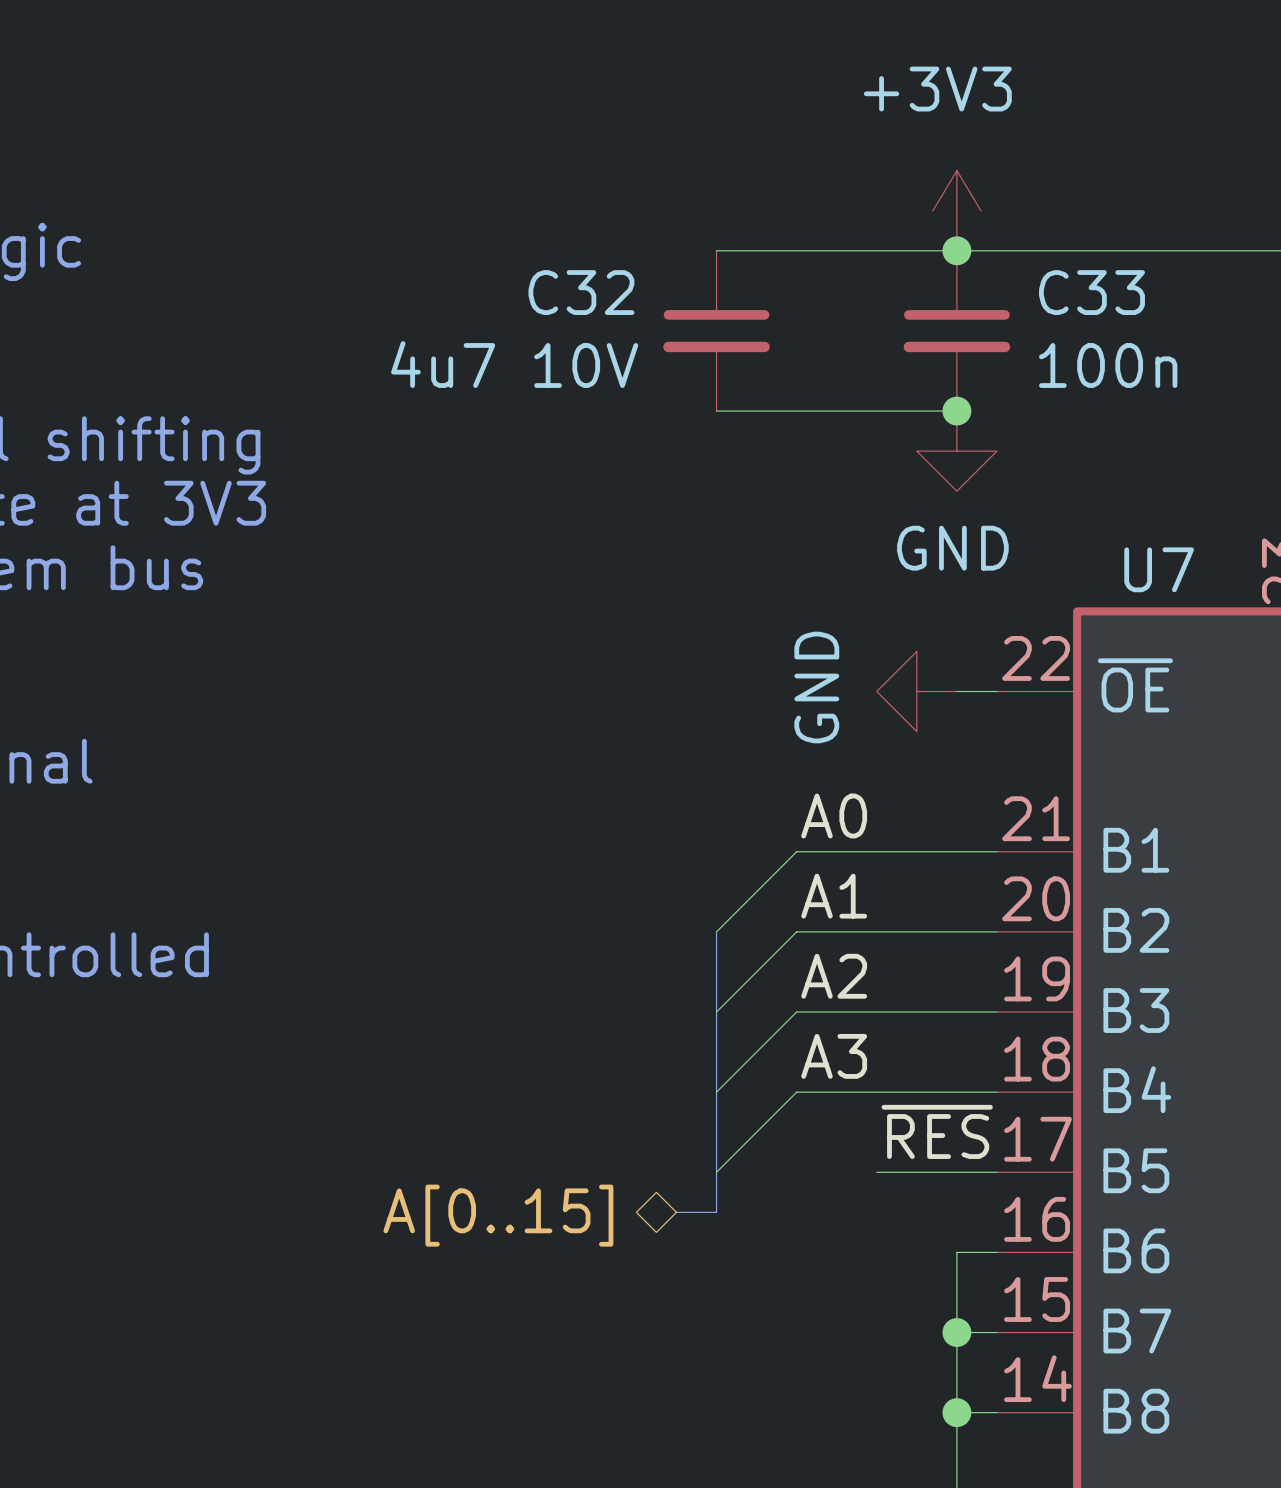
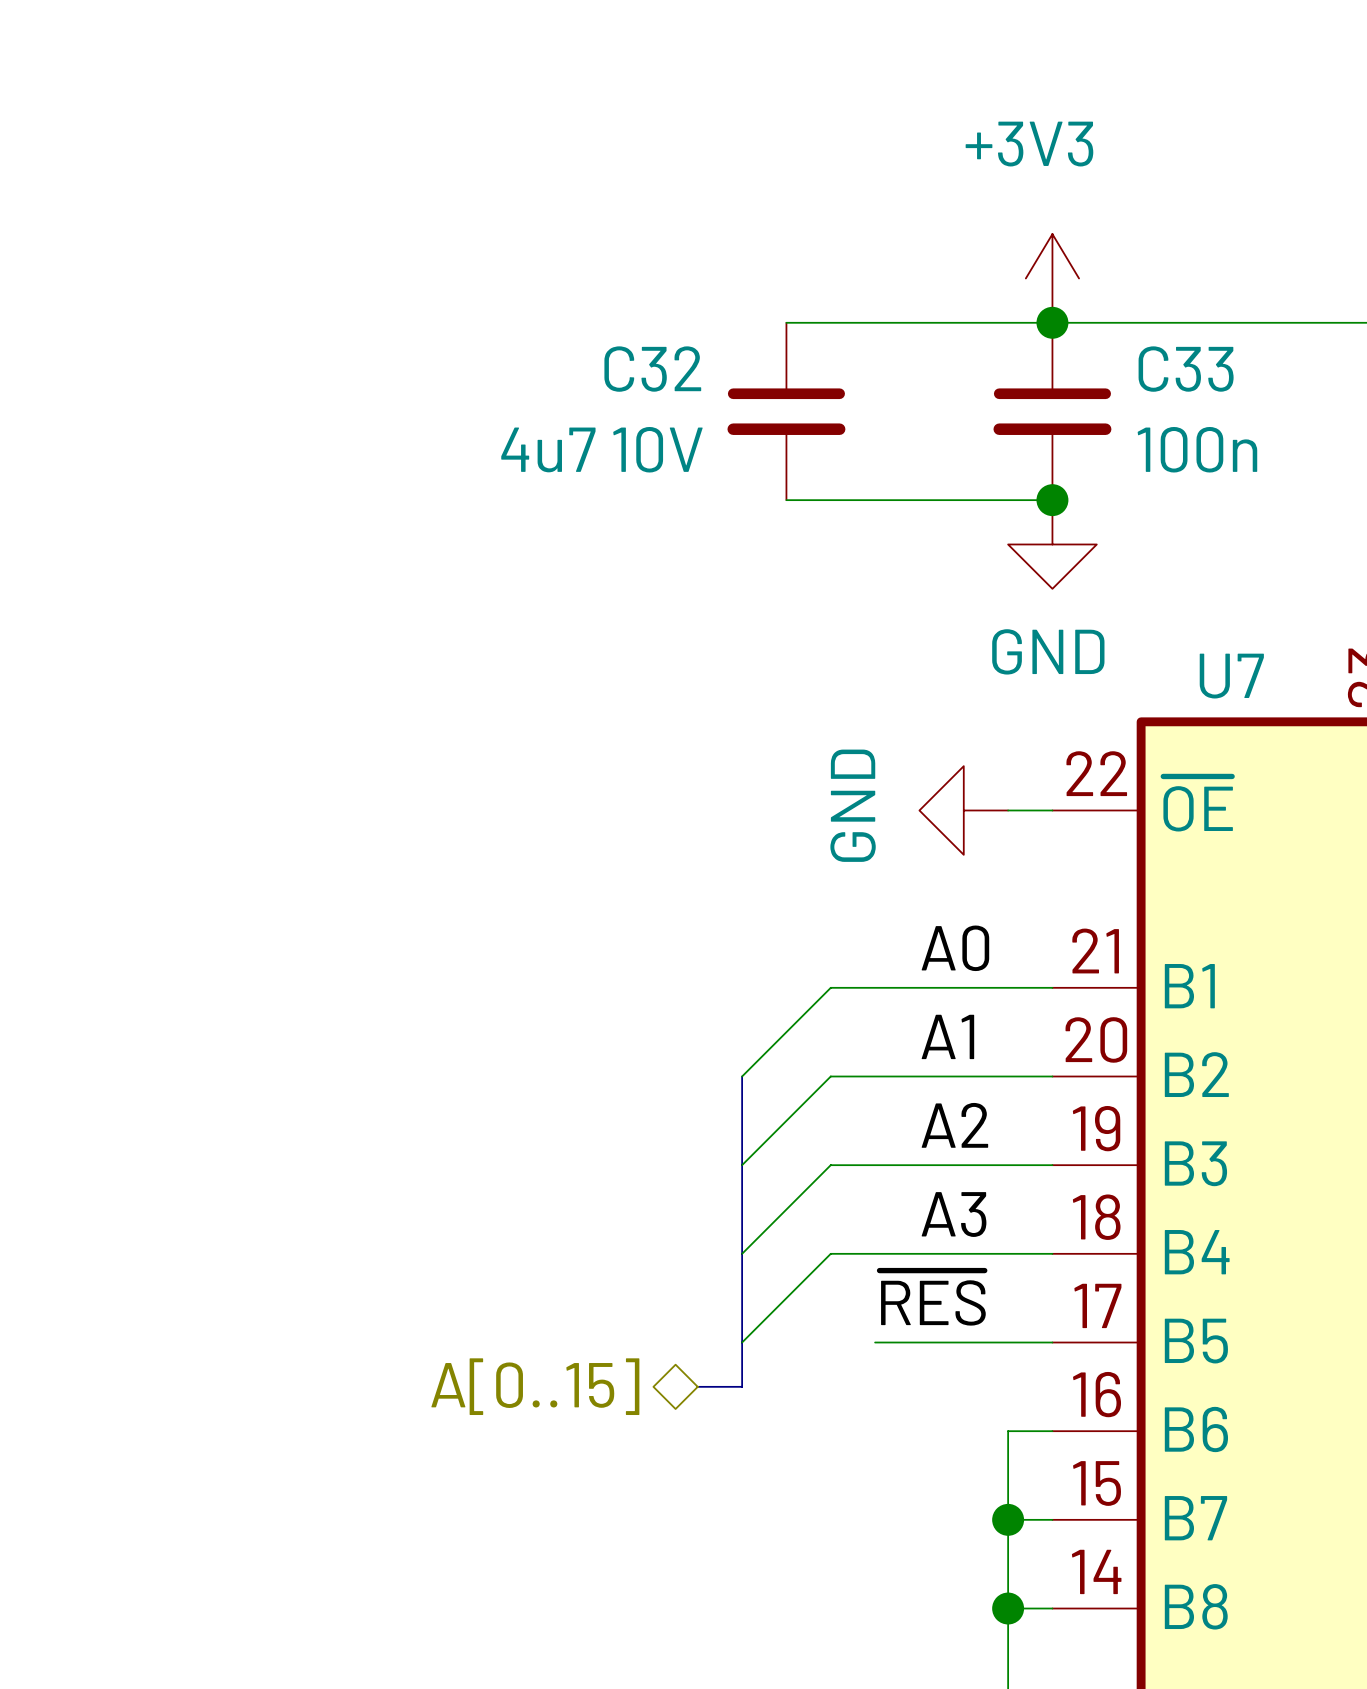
power symbol position: +3V3 (956, 210) -> +3V3 (1052, 278)
wire: (716, 250) (756, 250) -> none
junction position: (956, 250) -> (1052, 322)
C32 position: (716, 330) -> (786, 411)
C33 position: (956, 330) -> (1052, 411)
wire: (716, 411) (756, 411) -> (1008, 500) (1052, 500)
junction position: (956, 411) -> (1052, 500)
power symbol position: GND (956, 451) -> GND (1052, 544)
label position: A0 (834, 816) -> A0 (955, 948)
label position: A1 (834, 896) -> A1 (947, 1036)
label position: A2 (834, 976) -> A2 (954, 1125)
label position: A3 (834, 1056) -> A3 (953, 1214)
label position: ~{RES} (937, 1131) -> ~{RES} (932, 1298)
wire: none -> (875, 1342) (919, 1342)

